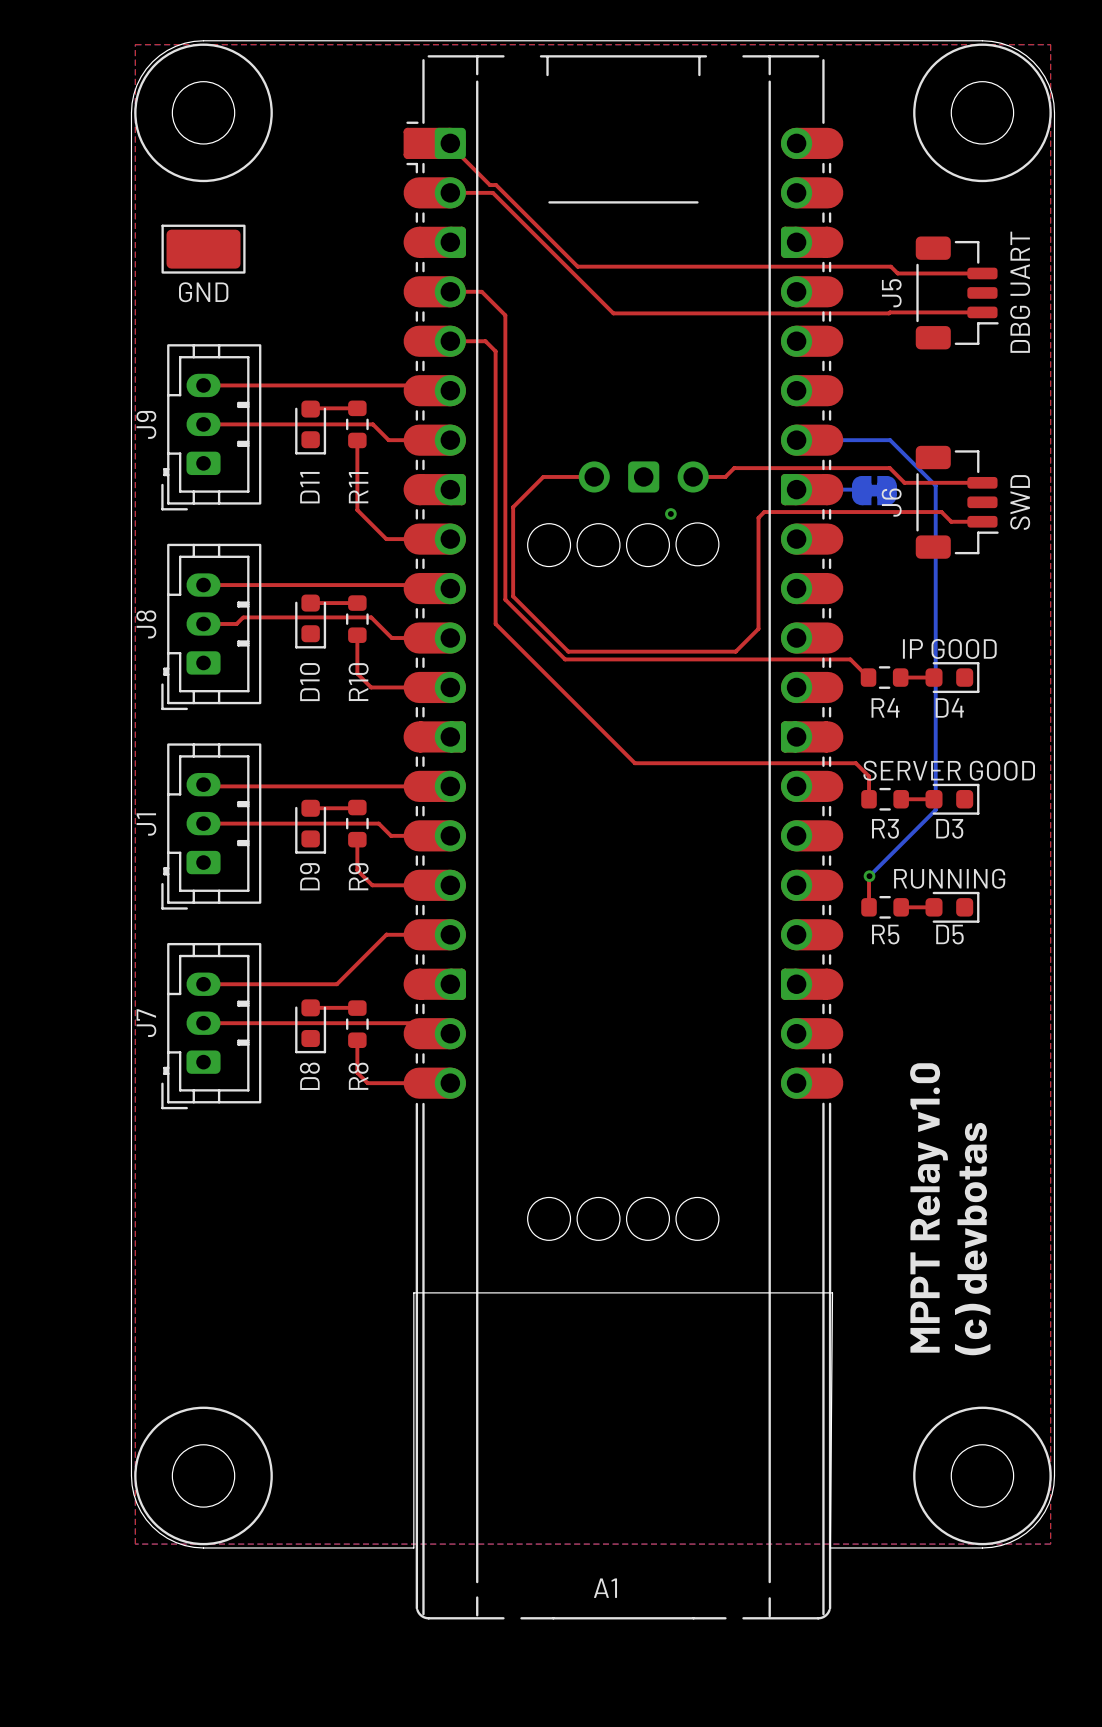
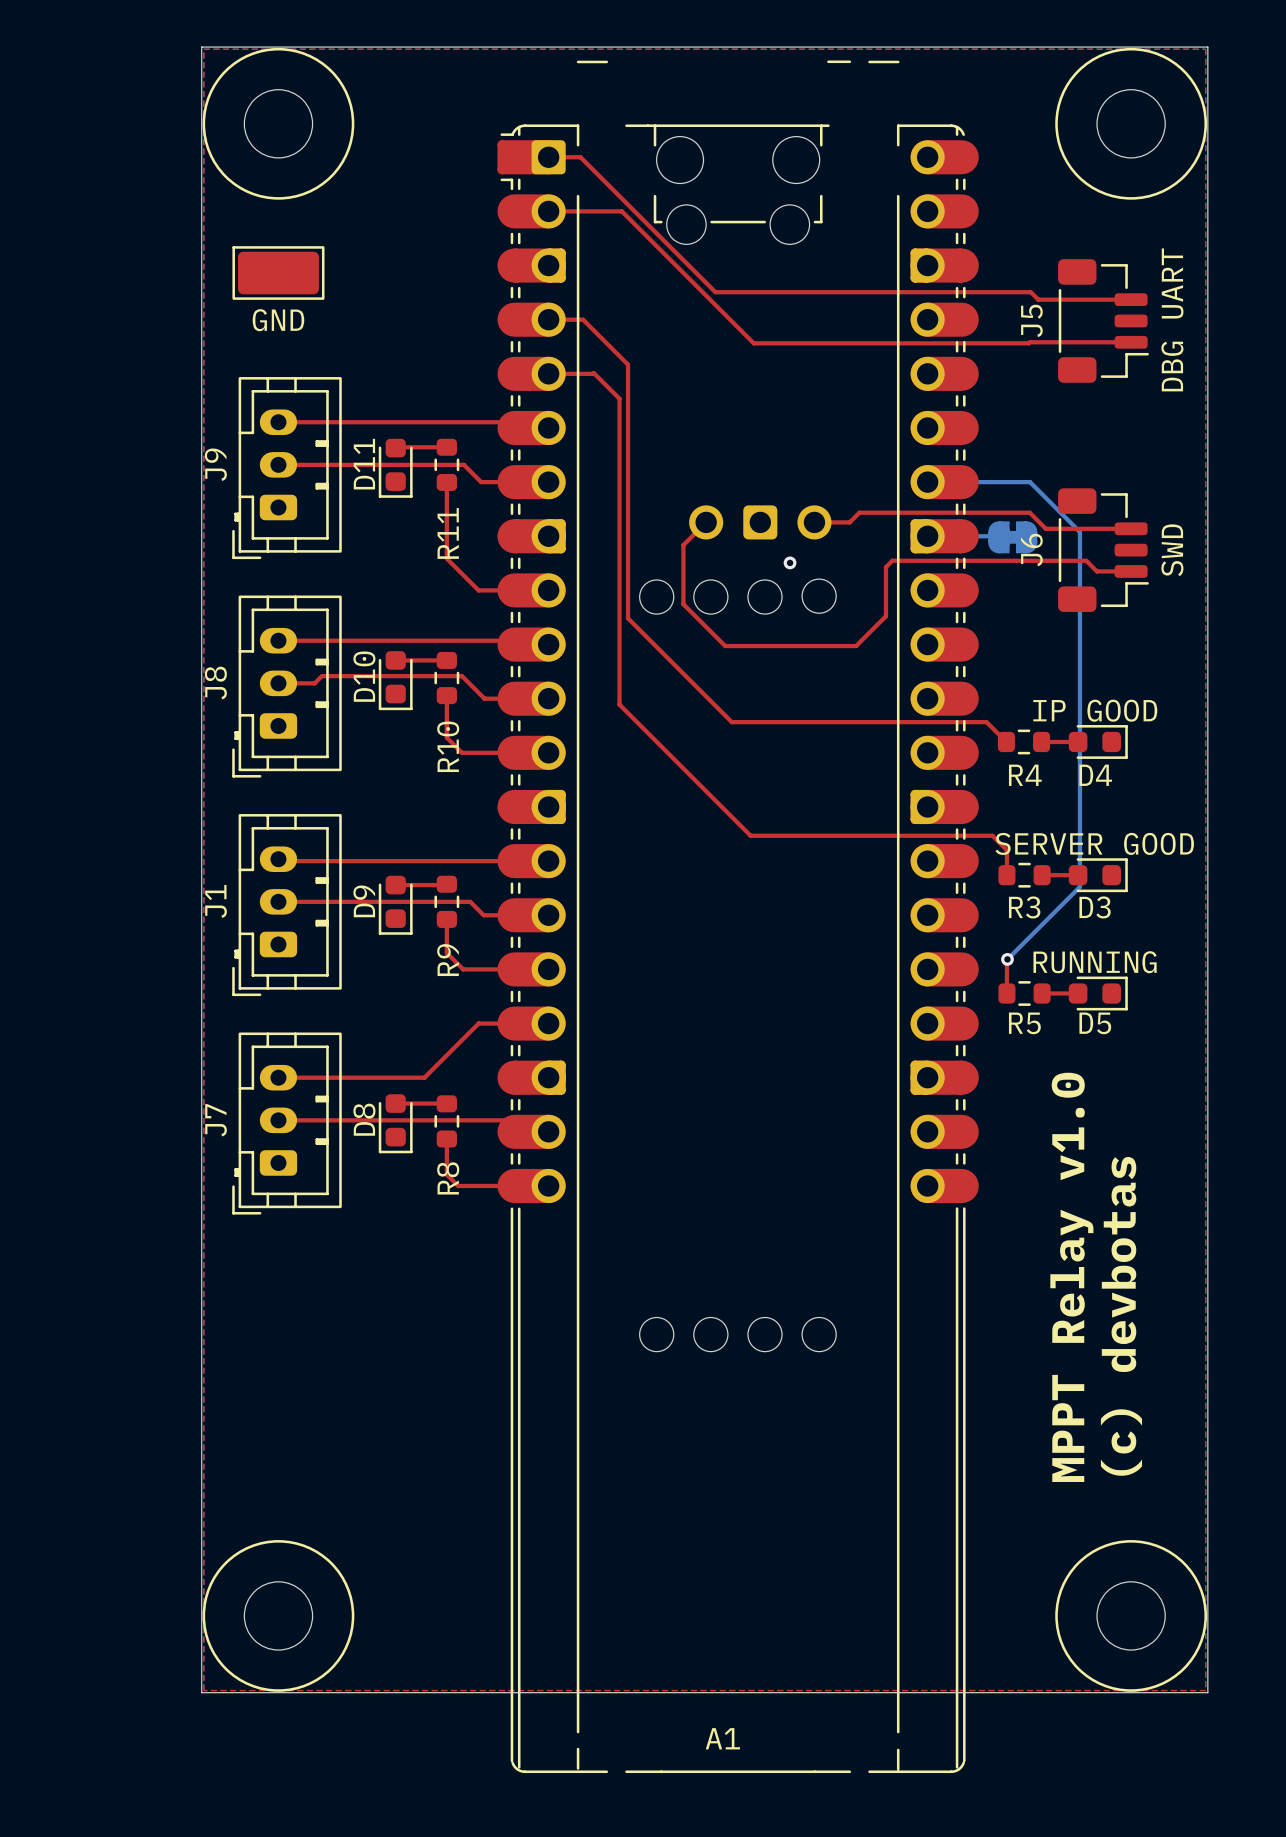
board edge: (203, 40) (982, 40) (1001, 43) (1018, 50) (1033, 61) (1044, 76) (1052, 94) (1054, 112) (1054, 1475) (1052, 1494) (1044, 1511) (1033, 1526) (1018, 1538) (1001, 1545) (982, 1547) (830, 1547) (832, 1292) (413, 1292) (413, 1547) (194, 1547) (175, 1542) (159, 1533) (141, 1511) (133, 1494) (131, 1475) (131, 112) (136, 85) (152, 61) (175, 46) (203, 40) -> (201, 47) (201, 1692) (1207, 1692) (1207, 47) (201, 47)
A1 footprint: [403, 55, 844, 1620] -> [497, 60, 979, 1774]
top track: (450, 143) (489, 185) (496, 185) (577, 266) (602, 266) -> (548, 157) (580, 157) (715, 292)
top track: (492, 192) (613, 313) (637, 313) -> (595, 211) (621, 211) (753, 343)
top track: (505, 315) (505, 599) (565, 659) (617, 659) -> (608, 345) (628, 364) (628, 618) (731, 722)
top track: (485, 341) (495, 351) (495, 623) (515, 643) -> (587, 373) (593, 373) (619, 398) (619, 704)
top track: (594, 476) (543, 476) (513, 507) (513, 596) (568, 651) (735, 651) (758, 628) (758, 562) -> (706, 522) (683, 545) (683, 604) (725, 646) (856, 646) (885, 616)
D11 name position: D11 (309, 487) -> D11 (364, 464)
D10 name position: D10 (309, 682) -> D10 (364, 676)
D9 name position: D9 (309, 876) -> D9 (364, 901)
D8 name position: D8 (309, 1076) -> D8 (364, 1119)

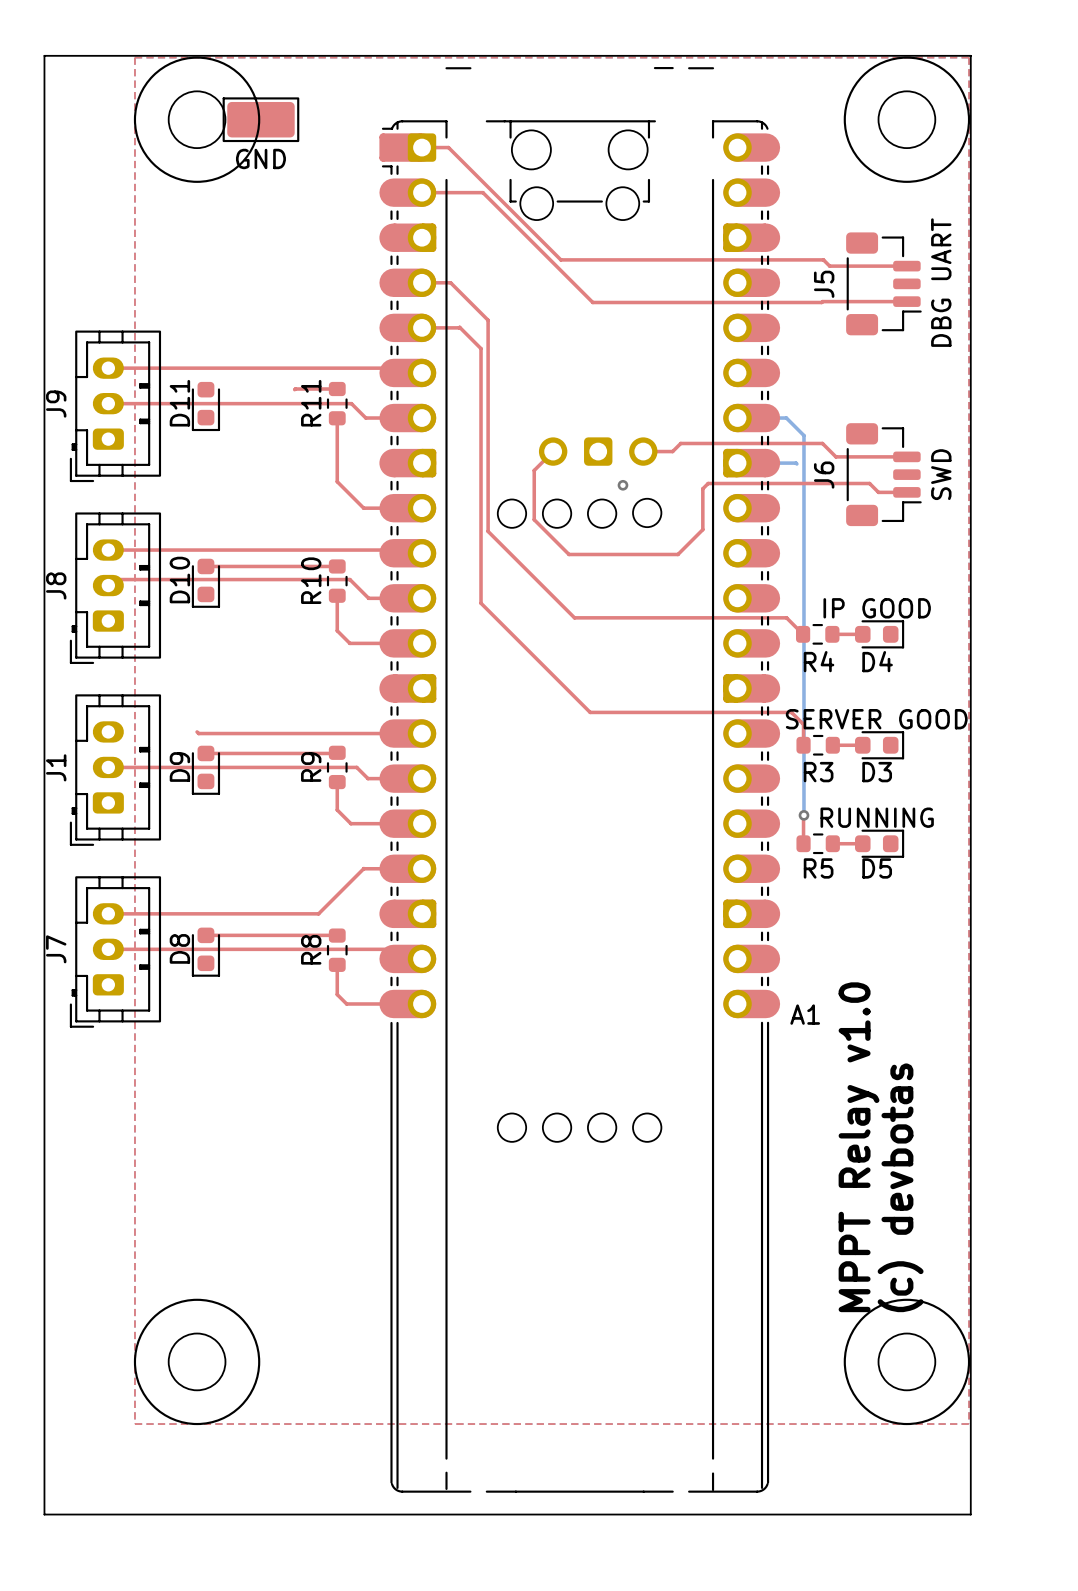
board edge: (201, 47) (201, 1692) (1207, 1692) -> (133, 55) (44, 55) (44, 1514) (970, 1514) (970, 1425)
part position: (278, 273) -> (260, 119)
top track: none -> (108, 368) (197, 368)
top track: none -> (108, 403) (197, 403)
J9 position: (286, 468) -> (115, 406)
D11 position: (395, 468) -> (205, 406)
bottom track: (986, 482) (1030, 482) (1079, 532) (1079, 886) (1007, 959) -> (786, 418) (803, 435) (803, 815)
R11 name position: R11 (448, 533) -> R11 (311, 403)
part: (1012, 537) -> none
top track: none -> (108, 550) (197, 550)
top track: none -> (205, 566) (295, 566)
top track: (285, 676) (278, 683) (314, 683) (321, 676) -> none
top track: none -> (234, 579) (114, 579) (108, 585)
D10 position: (395, 680) -> (205, 583)
J8 position: (286, 686) -> (115, 588)
R10 name position: R10 (448, 746) -> R10 (311, 580)
top track: none -> (205, 753) (294, 753)
top track: none -> (108, 767) (197, 767)
J1 position: (286, 905) -> (115, 770)
D9 position: (395, 905) -> (205, 770)
R9 name position: R9 (448, 960) -> R9 (311, 767)
top track: none -> (108, 913) (197, 913)
top track: none -> (205, 935) (294, 935)
top track: none -> (108, 949) (197, 949)
J7 position: (286, 1123) -> (115, 951)
D8 position: (395, 1123) -> (205, 952)
R8 name position: R8 (448, 1178) -> R8 (311, 949)
text position: MPPT Relay v1.0 (1071, 1277) -> MPPT Relay v1.0 (859, 1147)
text position: (c) devbotas (1121, 1316) -> (c) devbotas (900, 1187)
A1 name position: A1 (722, 1738) -> A1 (805, 1014)

